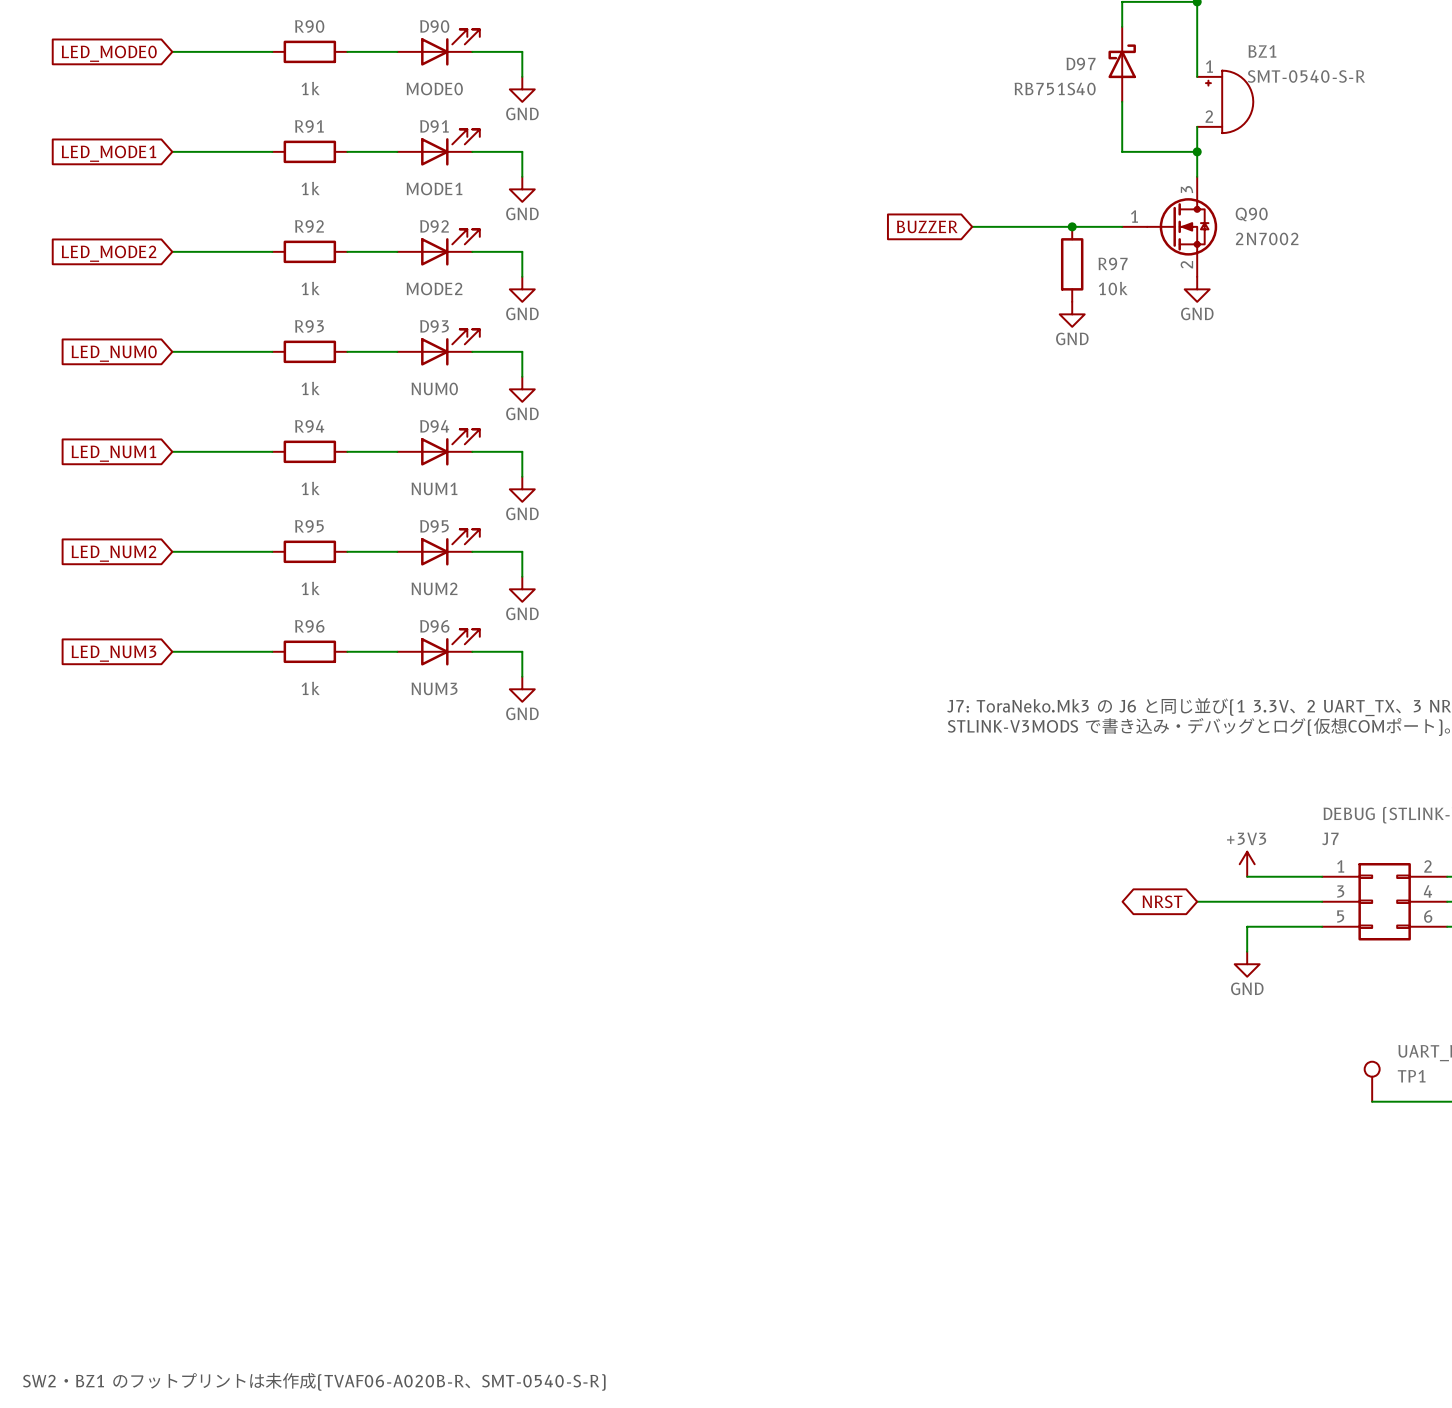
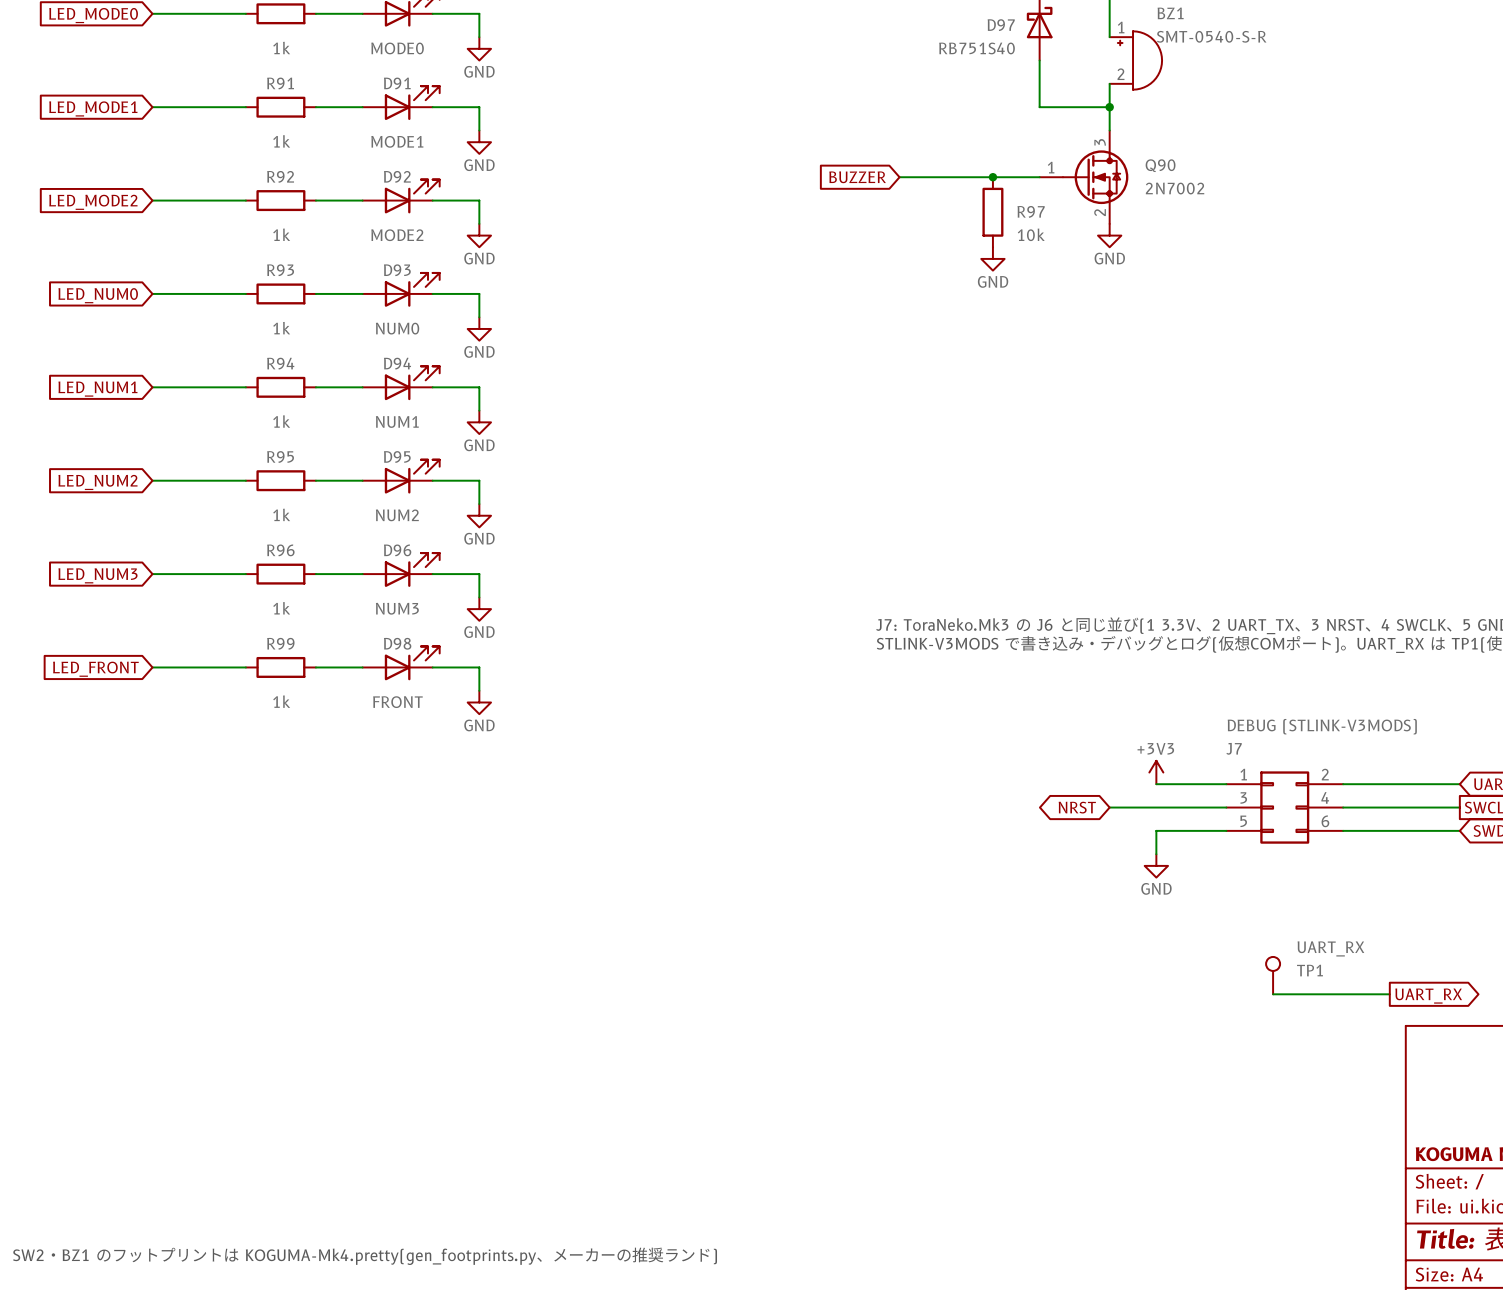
D98: none -> FRONT (401, 663)
wire: none -> (152, 667) (245, 667)
R99: none -> 1k (280, 667)
wire: none -> (315, 667) (362, 667)
wire: none -> (432, 667) (479, 667) (479, 690)
global label: none -> LED_FRONT (95, 669)
power symbol: none -> GND (479, 702)
text: SW2・BZ1 のフットプリントは未作成(TVAF06-A020B-R、SMT-0540-S-R) (314, 1381) -> SW2・BZ1 のフットプリントは KOGUMA-Mk4.pretty(gen_footprints.py、メーカーの推奨ランド) (365, 1256)

